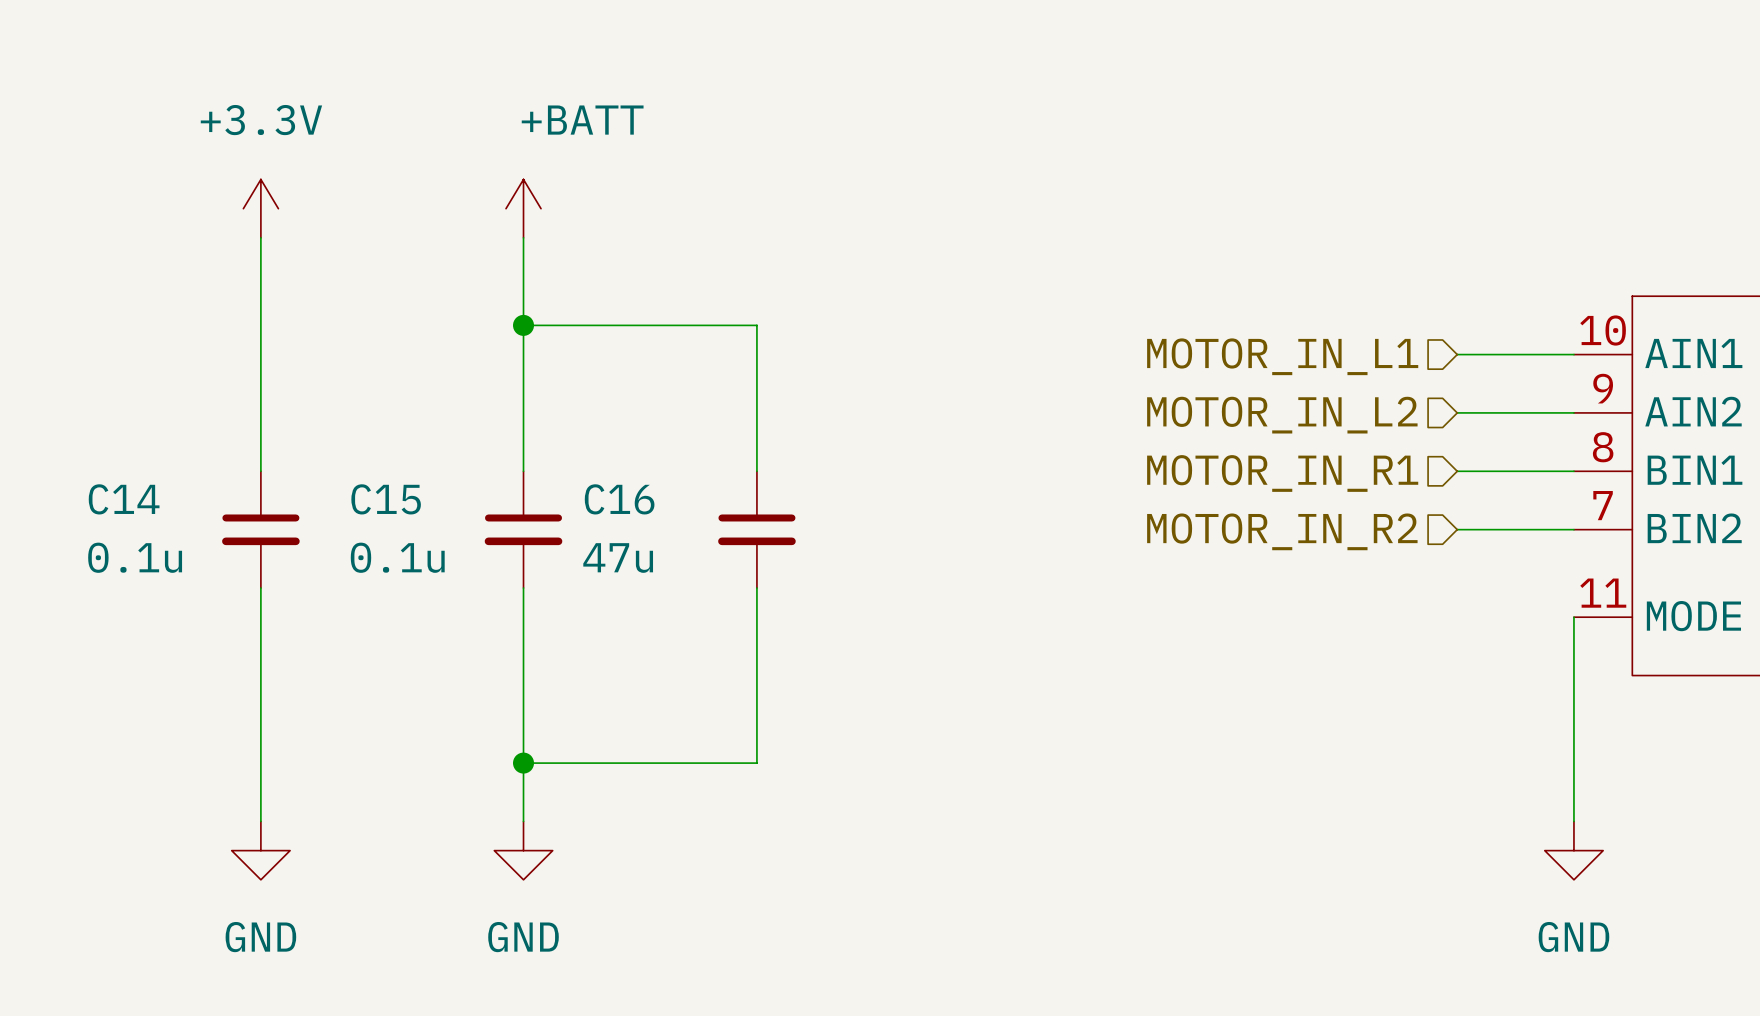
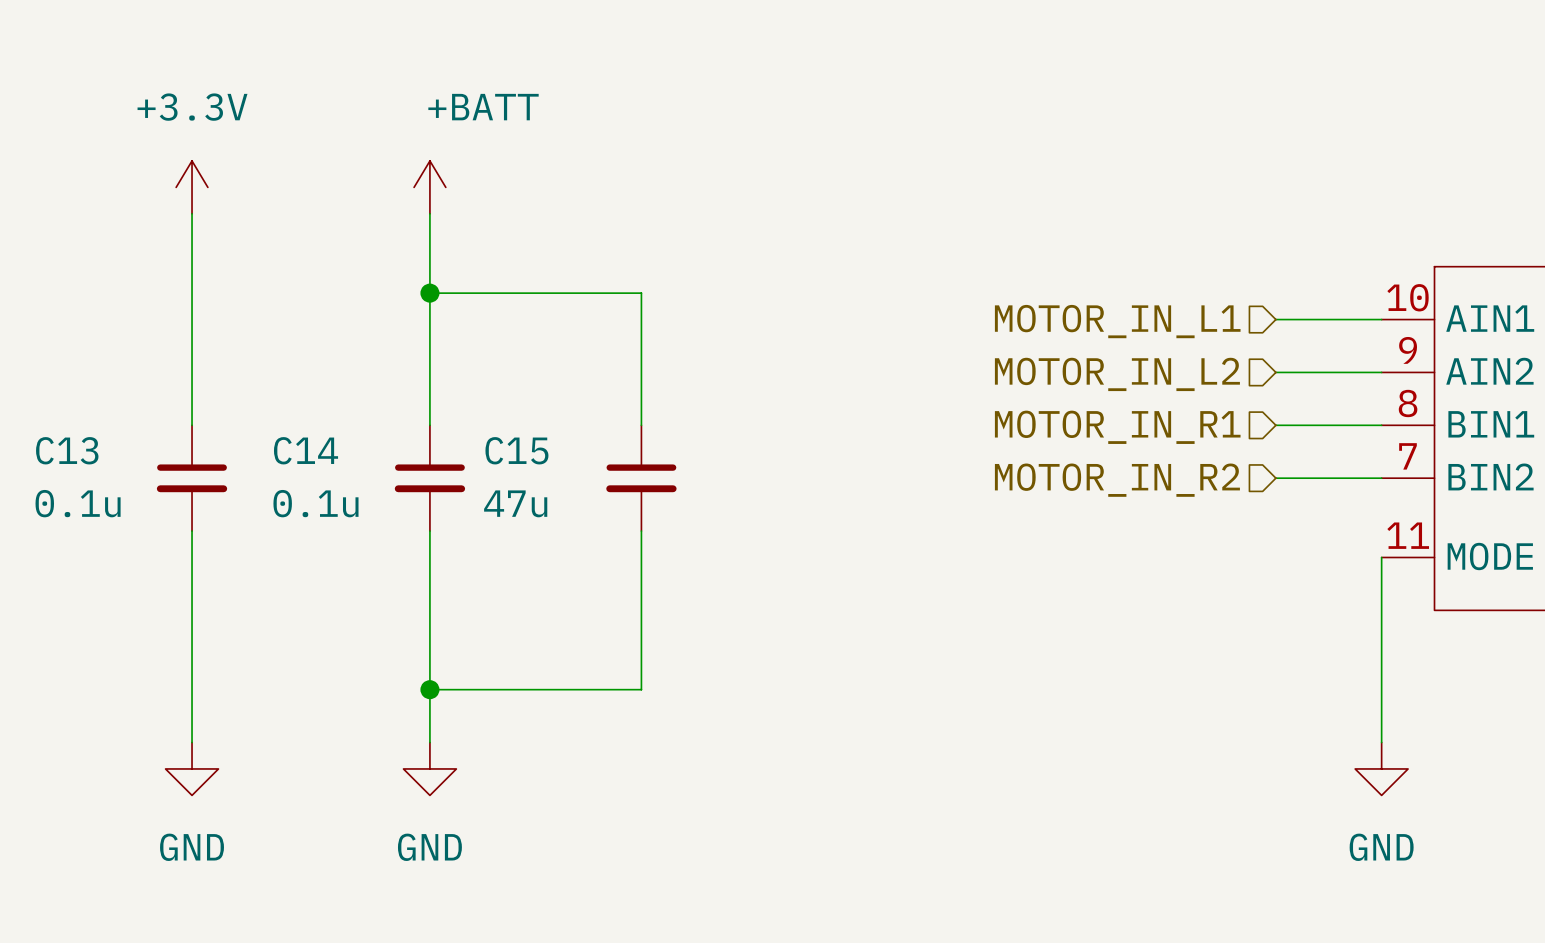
C14 name: C14 (124, 499) -> C13 (67, 450)
C15 name: C15 (386, 499) -> C14 (306, 450)
C16 name: C16 (619, 499) -> C15 (516, 450)

